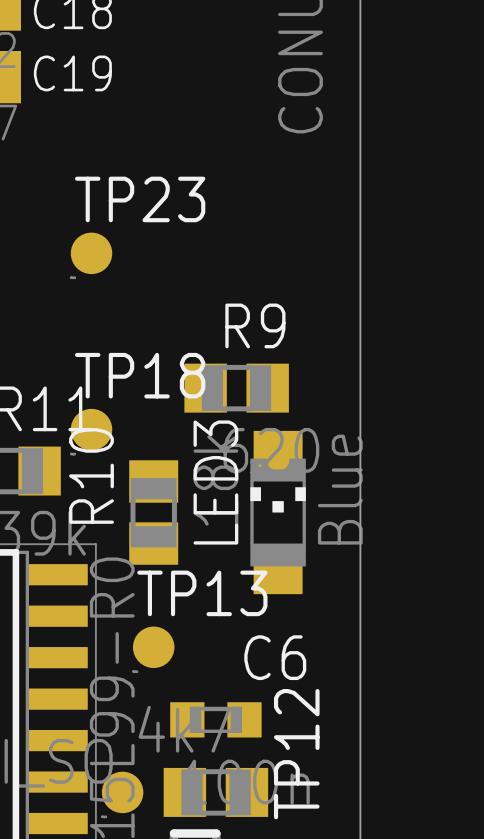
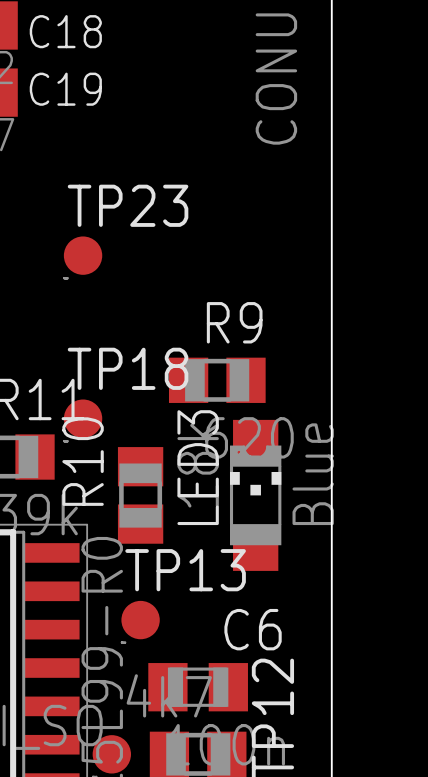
C6 footprint: [170, 702, 262, 738] -> [148, 663, 248, 712]

